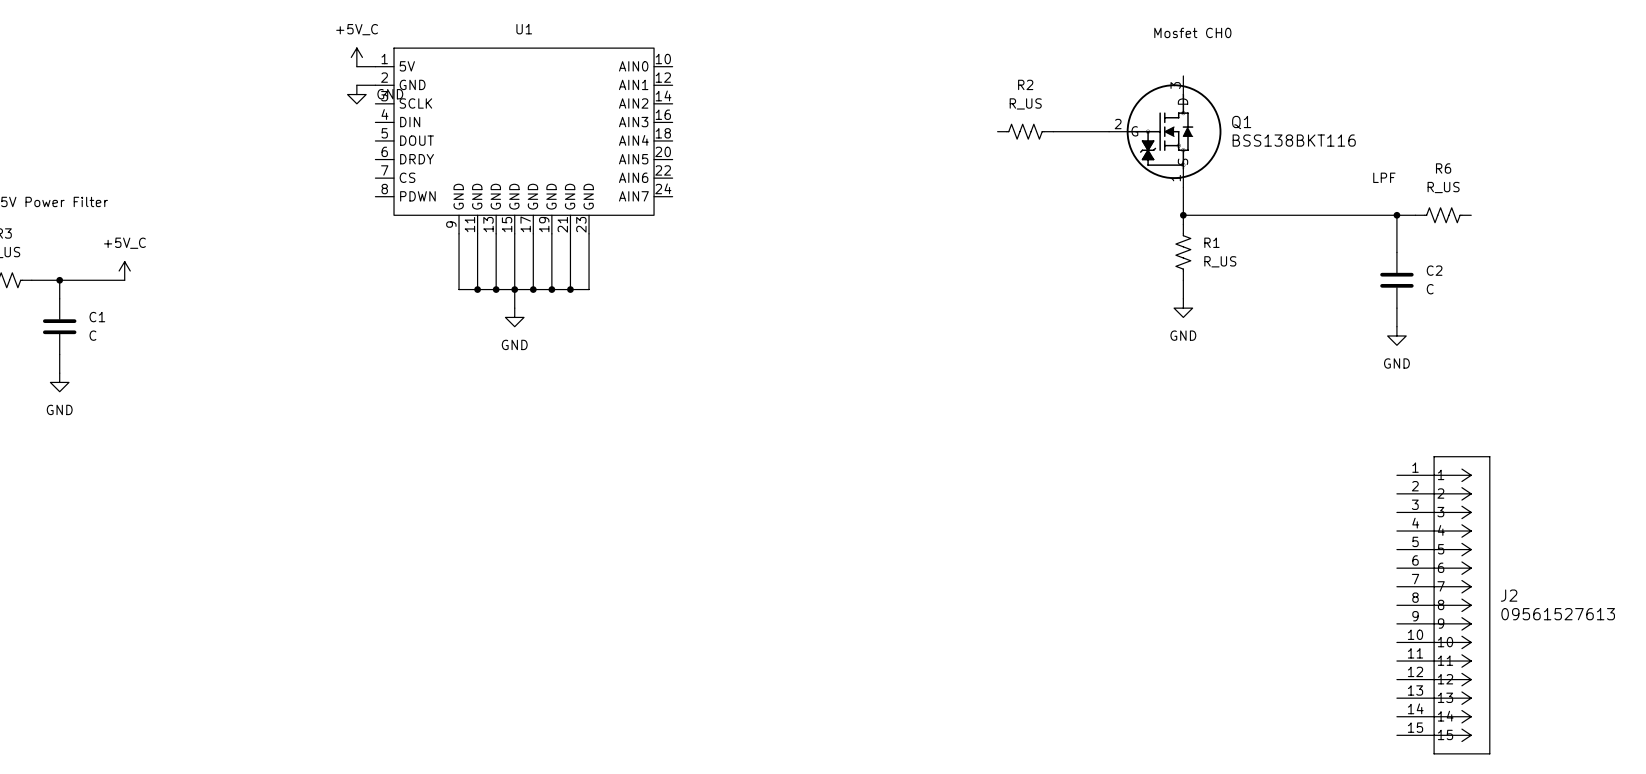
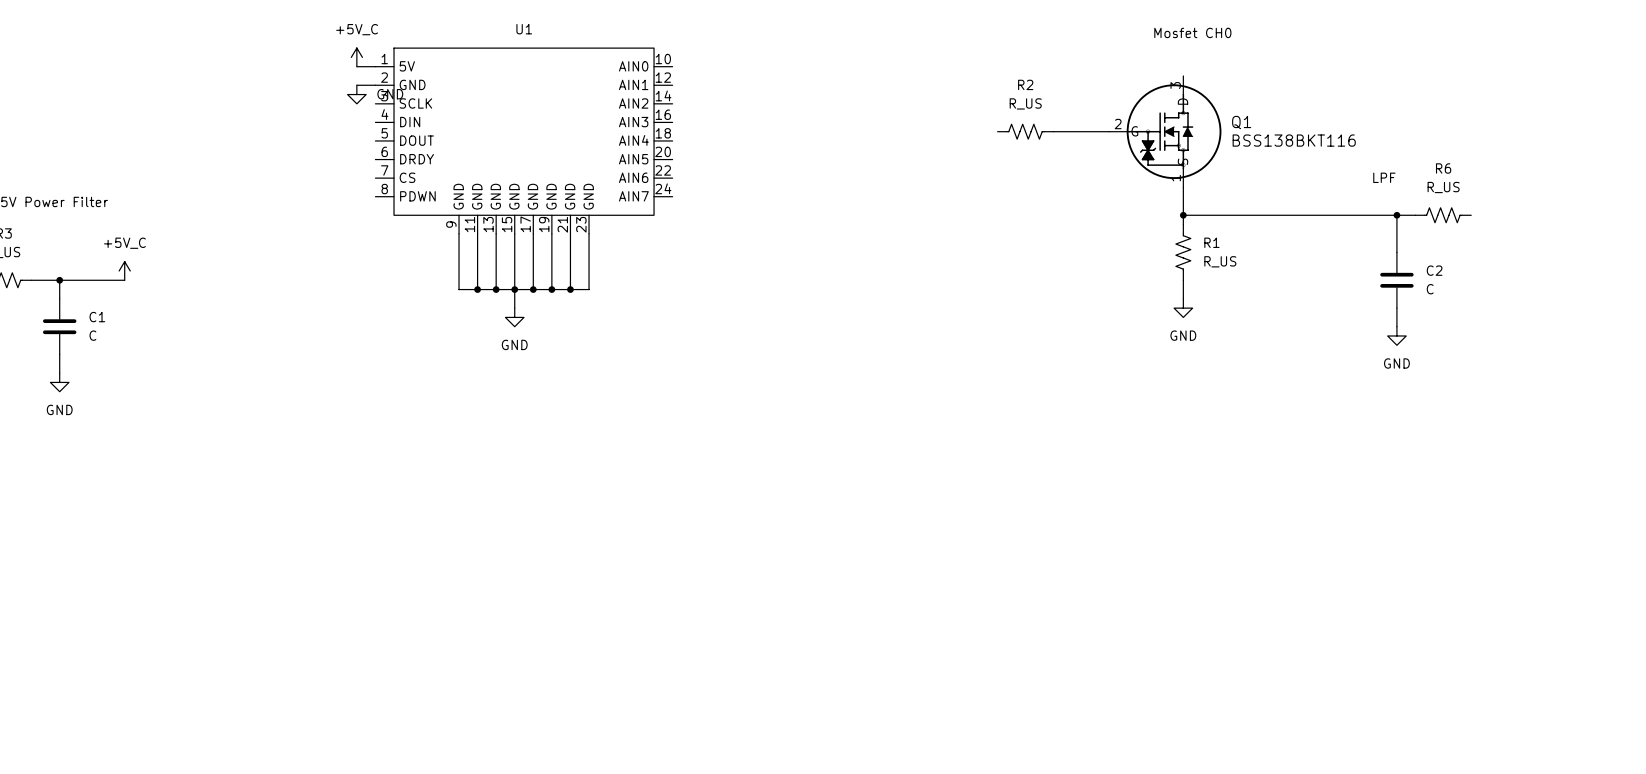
J2: 09561527613 (1443, 605) -> none

